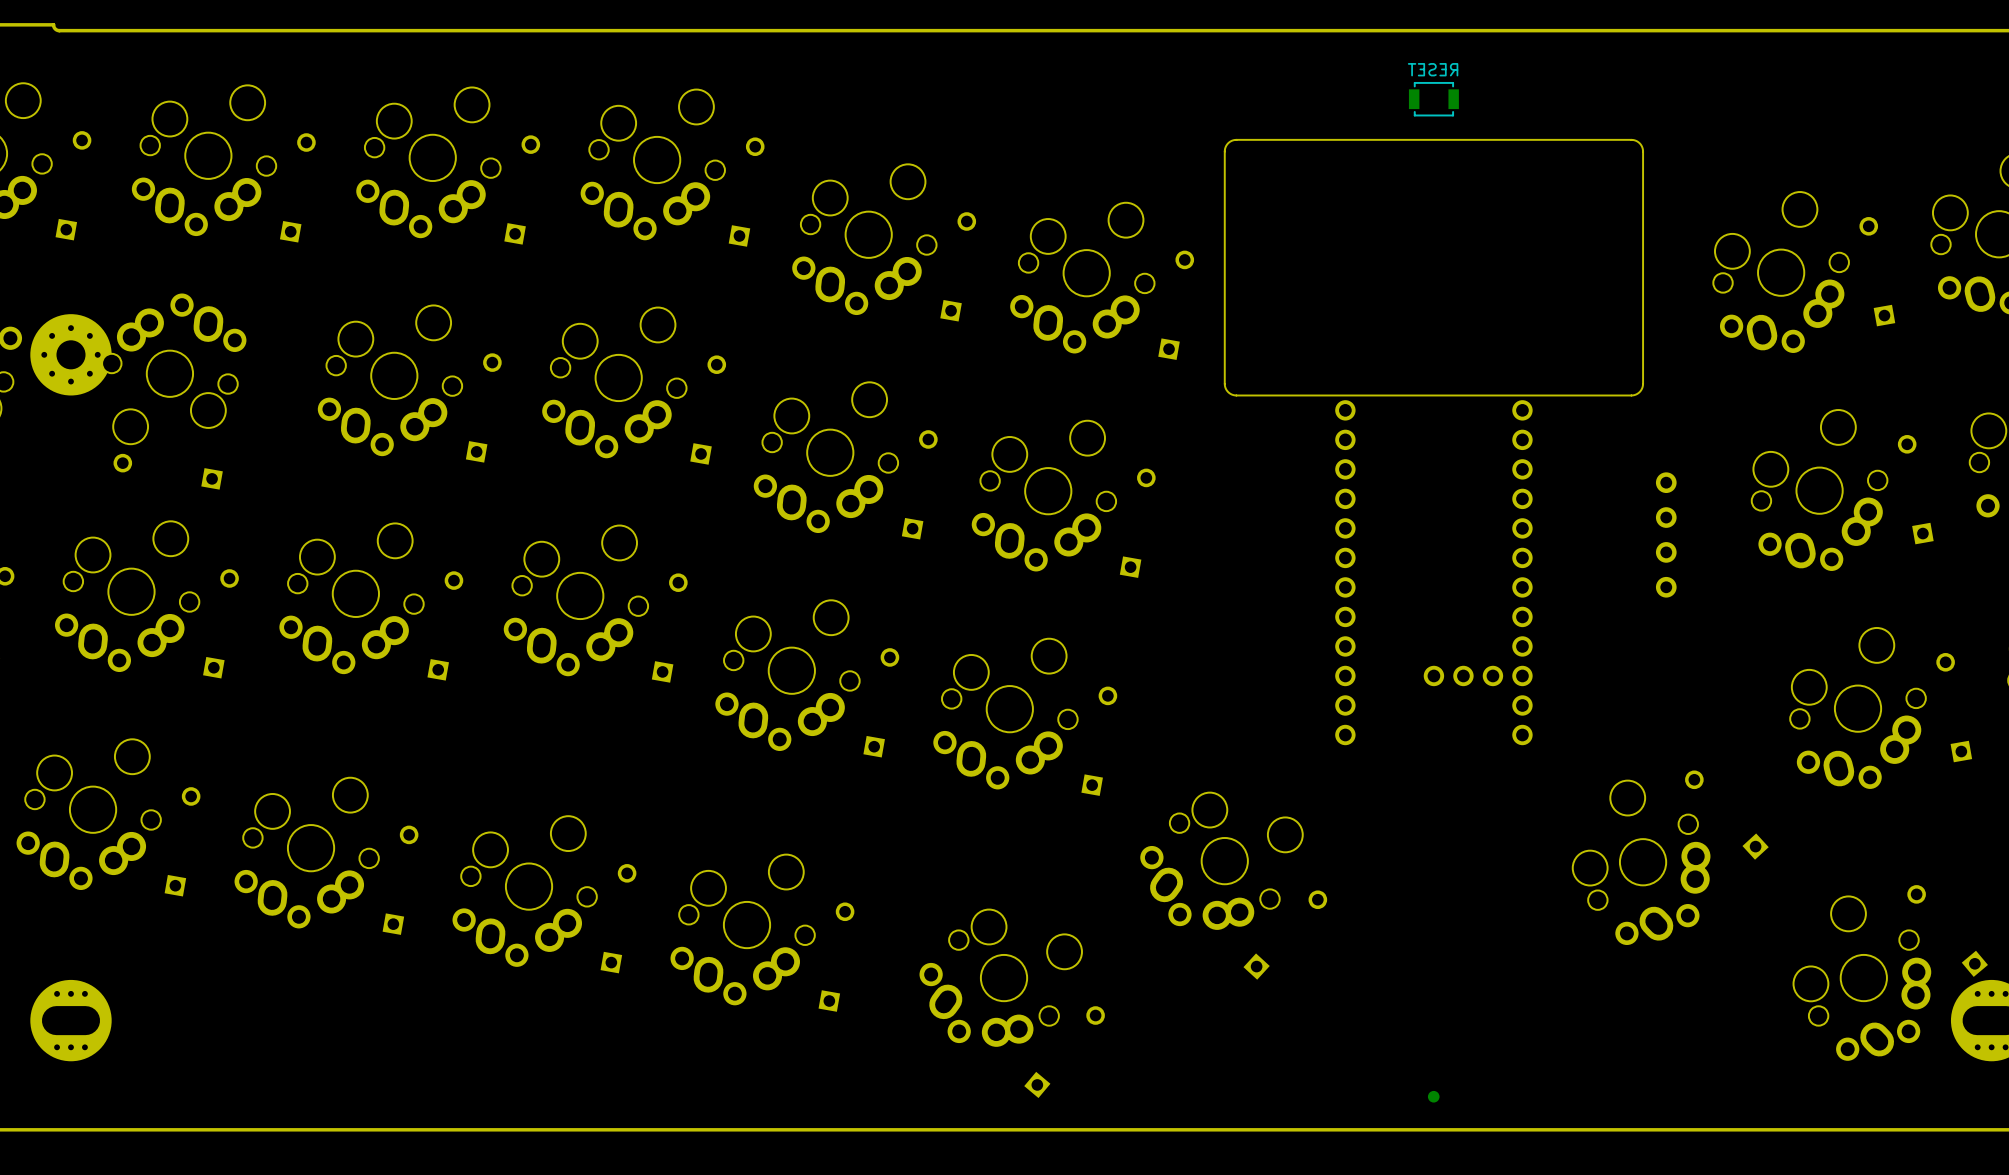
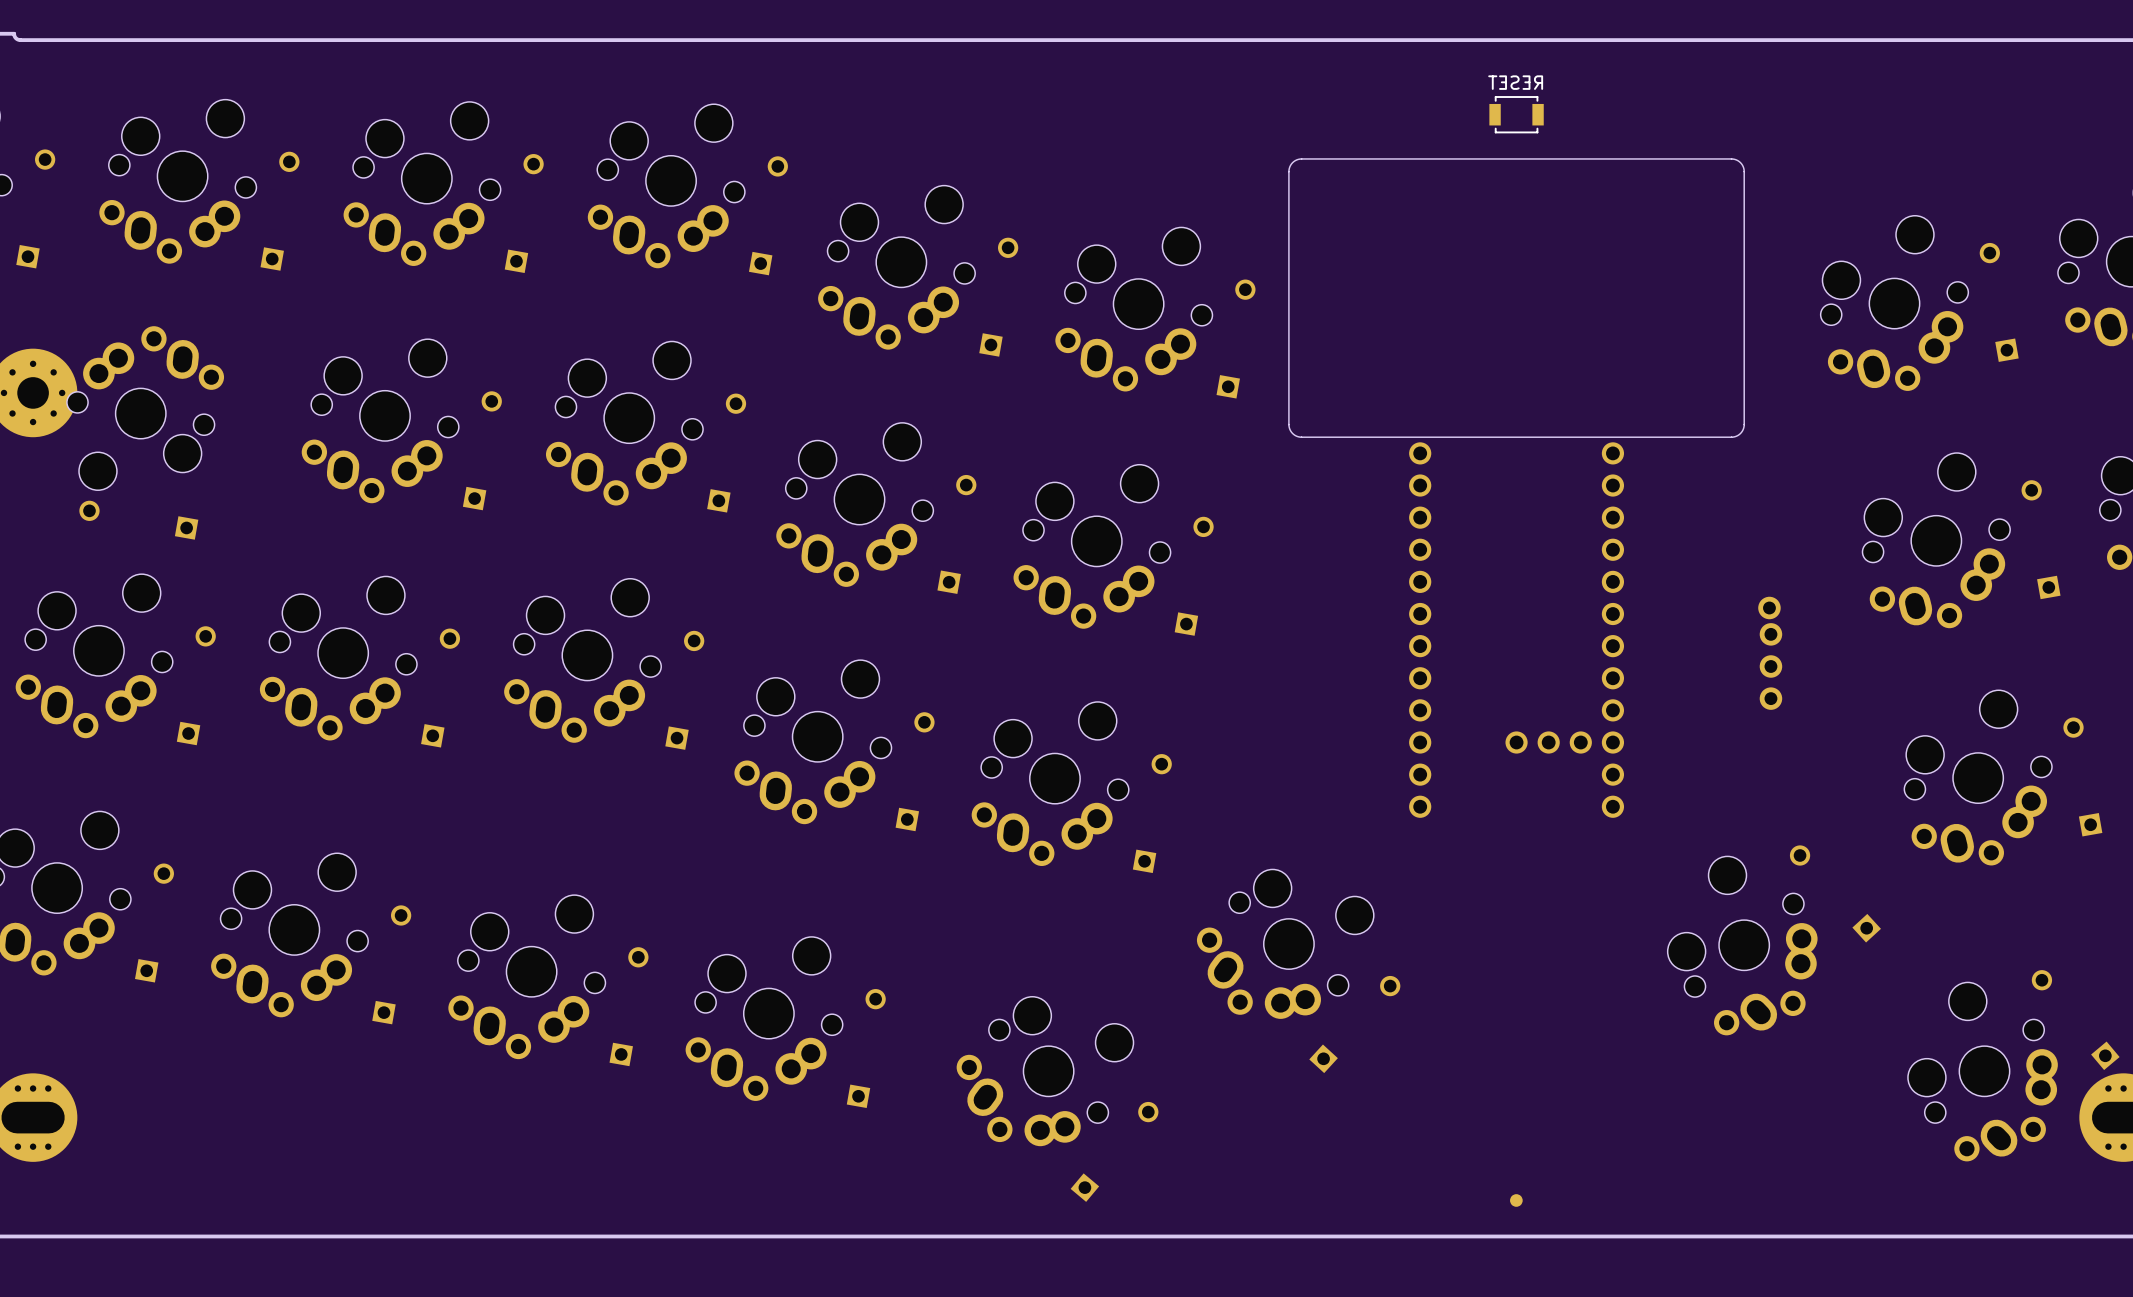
part: (1666, 482) -> none
part: (1666, 517) -> none
part: none -> (1770, 634)
part: (1666, 587) -> none
part: none -> (1770, 666)
part: none -> (1770, 698)

